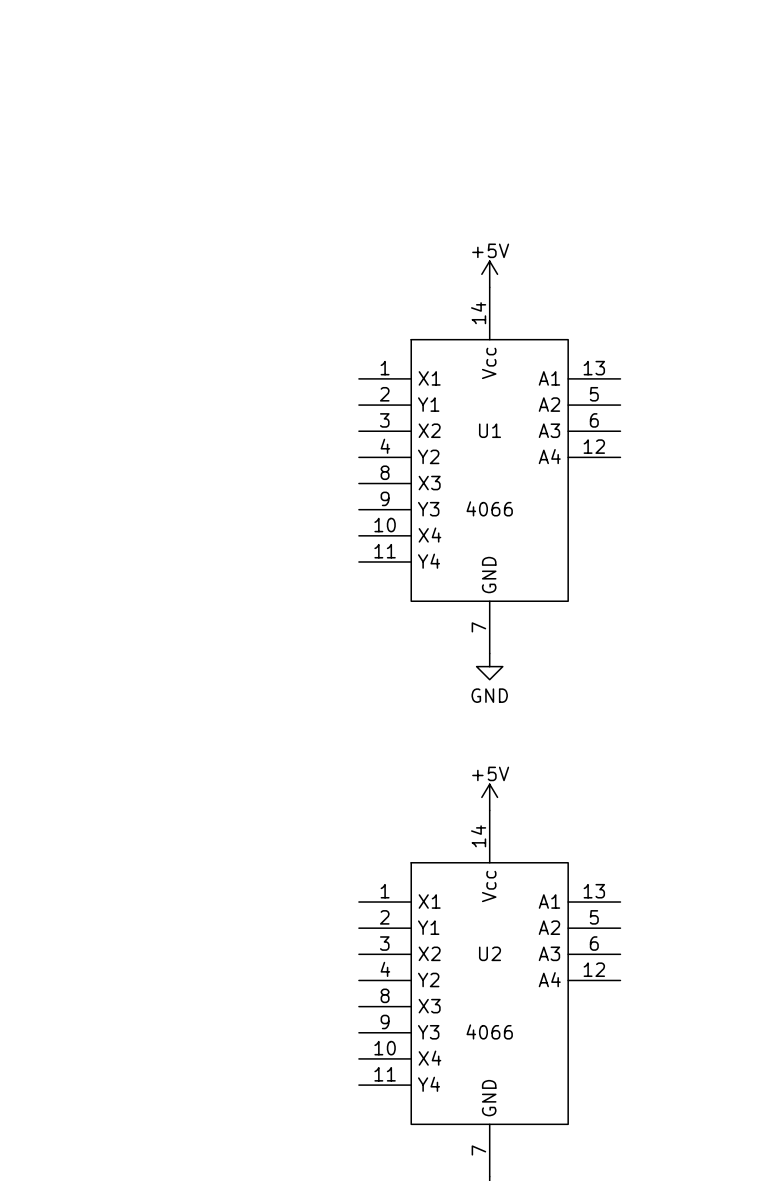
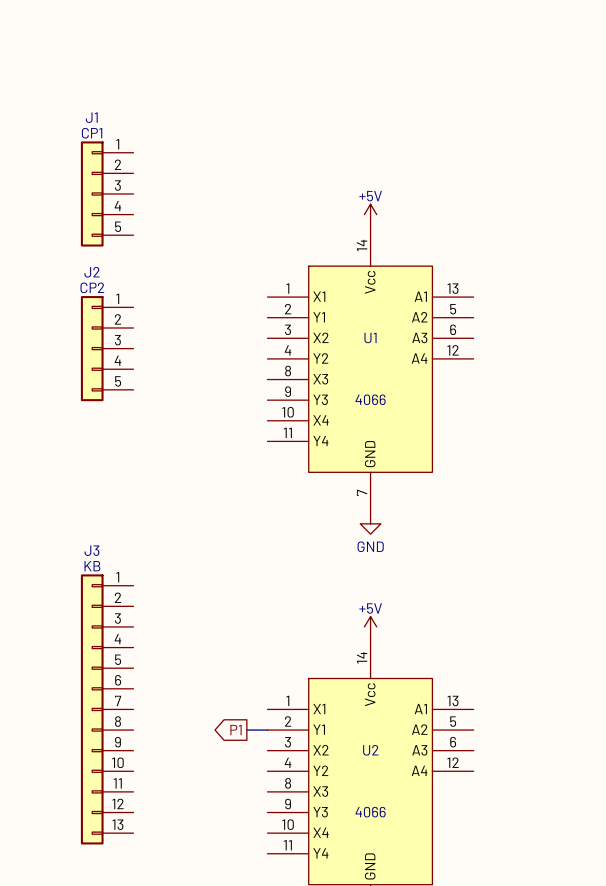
J1: none -> CP1 (107, 193)
J2: none -> CP2 (107, 348)
J3: none -> KB (107, 709)
global label: none -> P1 (236, 730)
wire: none -> (246, 730) (267, 730)

